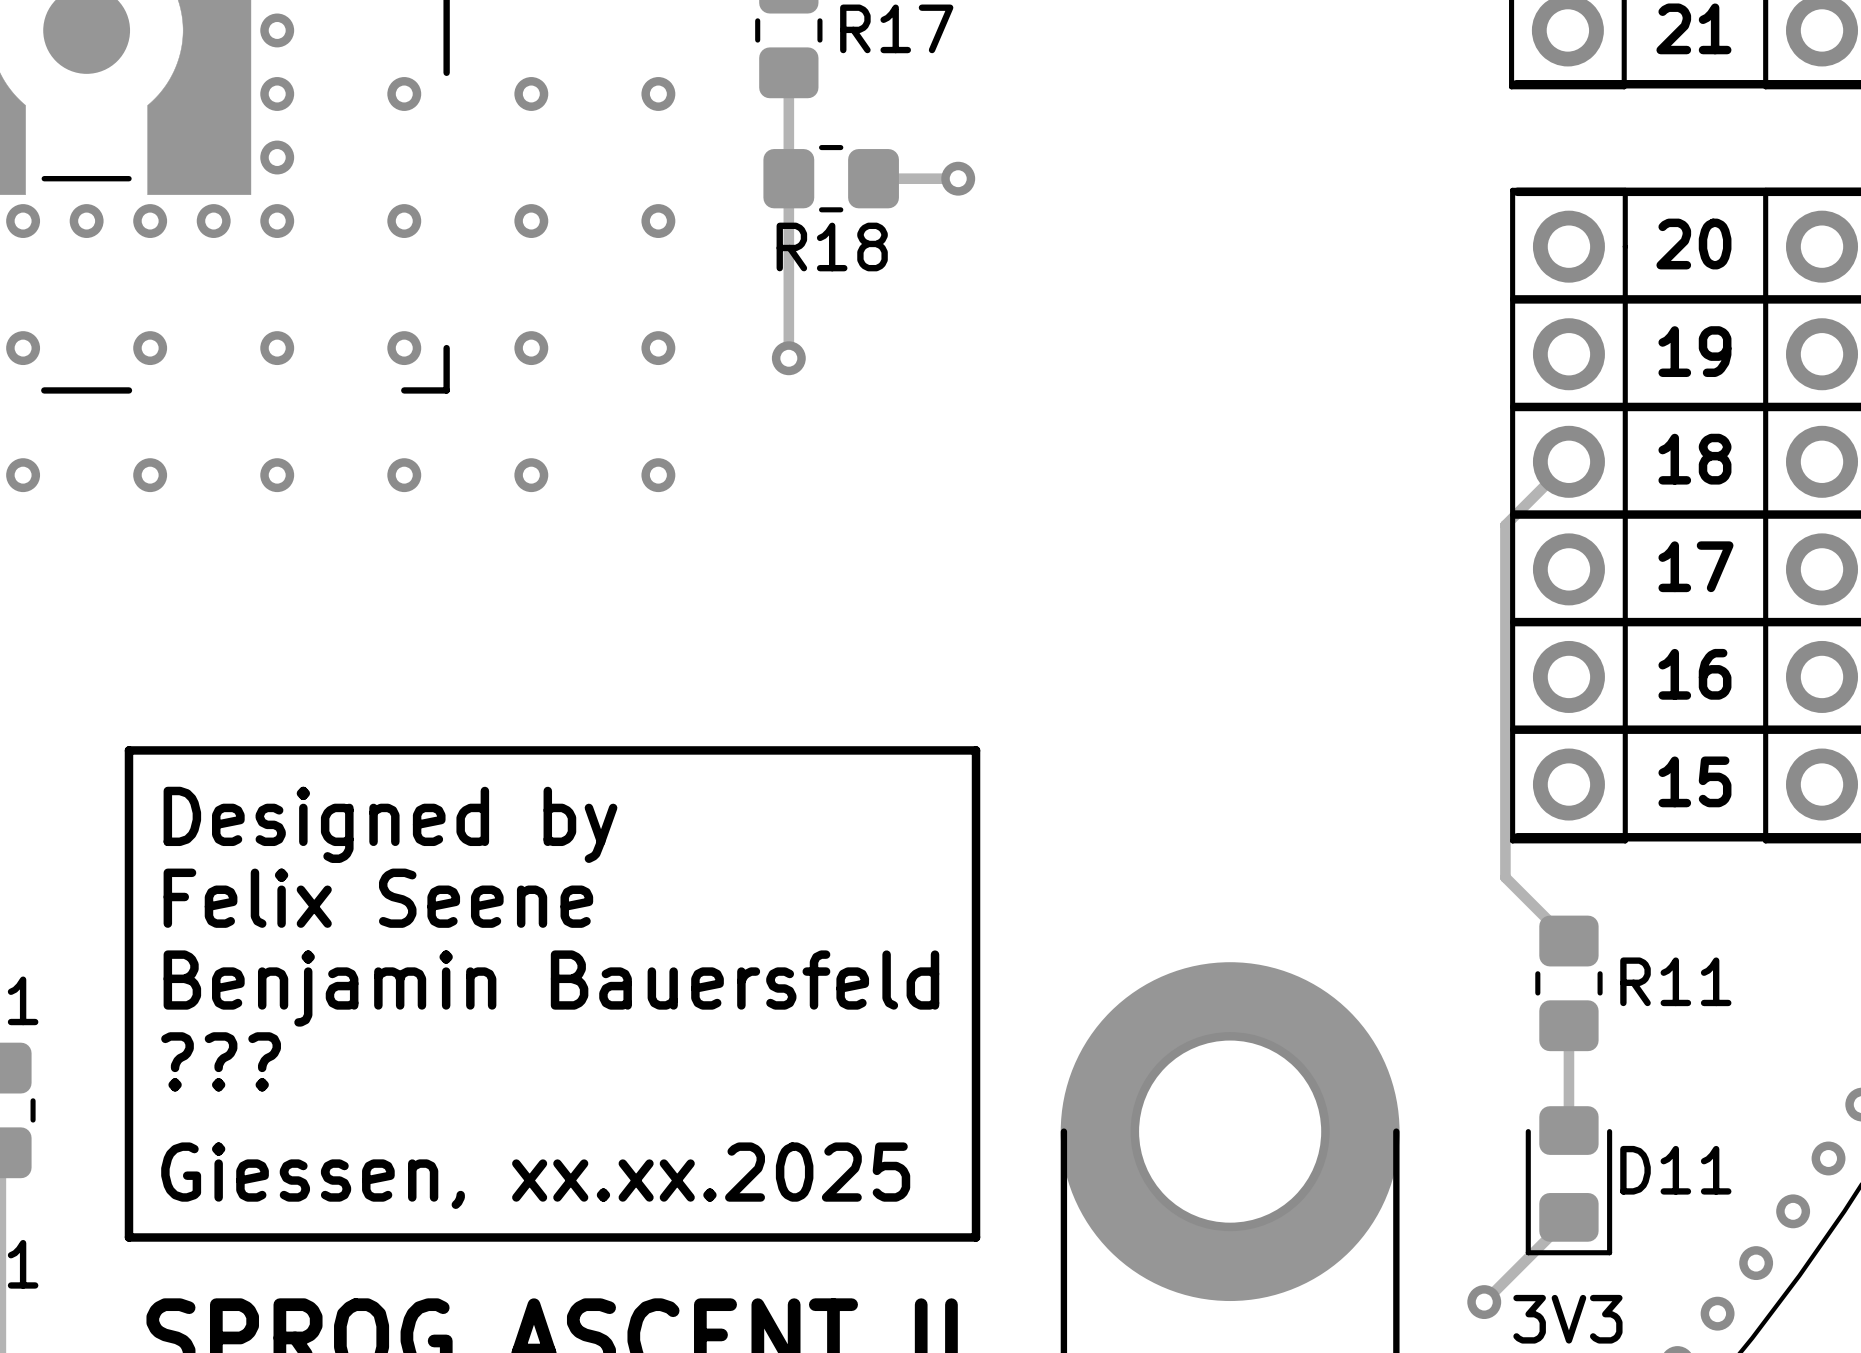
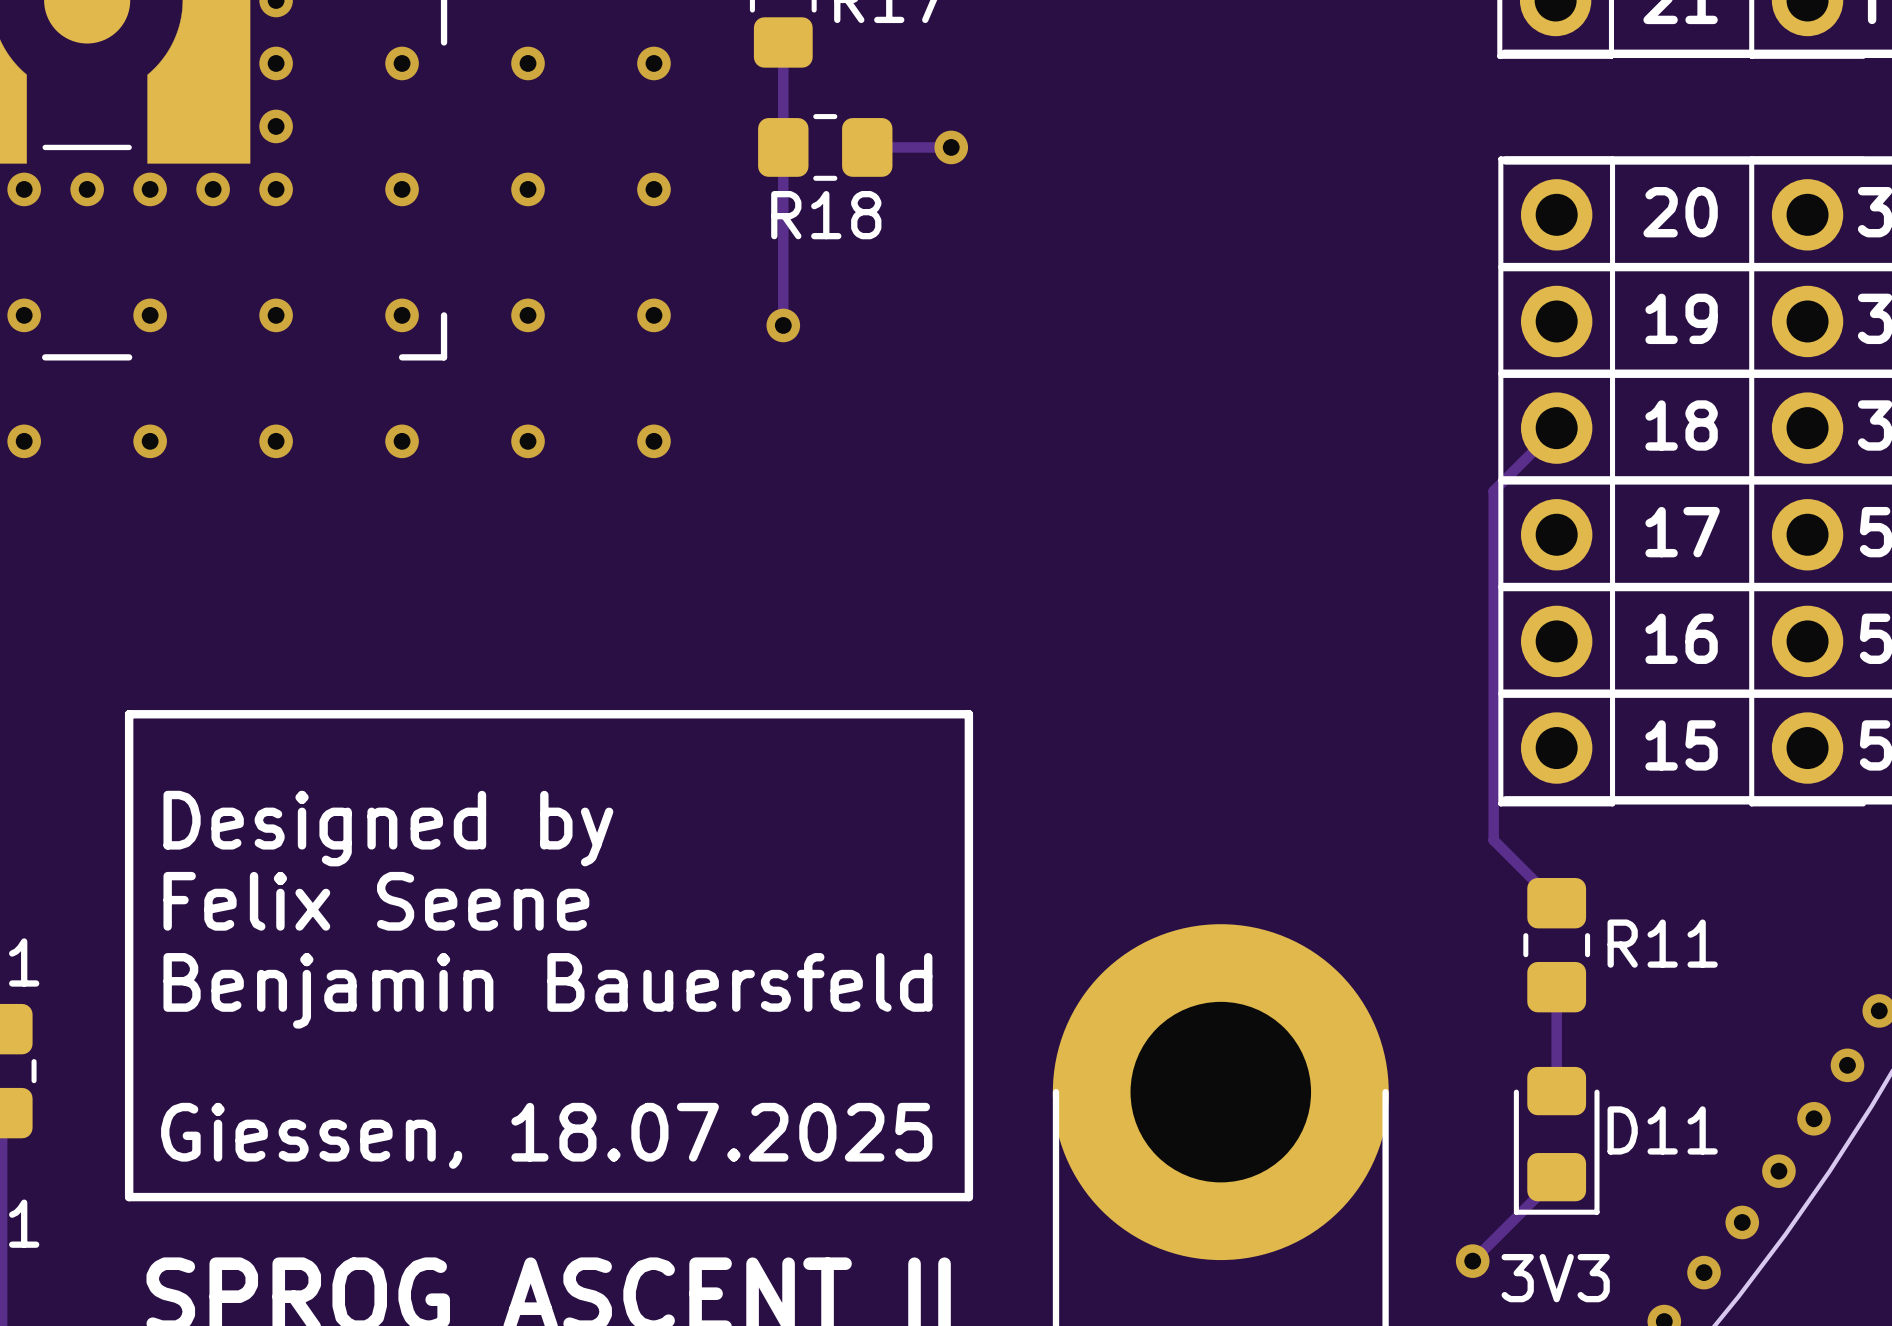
text position: Designed by (390, 824) -> Designed by (388, 828)
text position: Felix Seene (378, 898) -> Felix Seene (376, 901)
text position: Benjamin Bauersfeld (551, 988) -> Benjamin Bauersfeld (547, 990)
text: ??? (221, 1061) -> none
text: Giessen, xx.xx.2025 (535, 1175) -> Giessen, 18.07.2025 (546, 1135)

